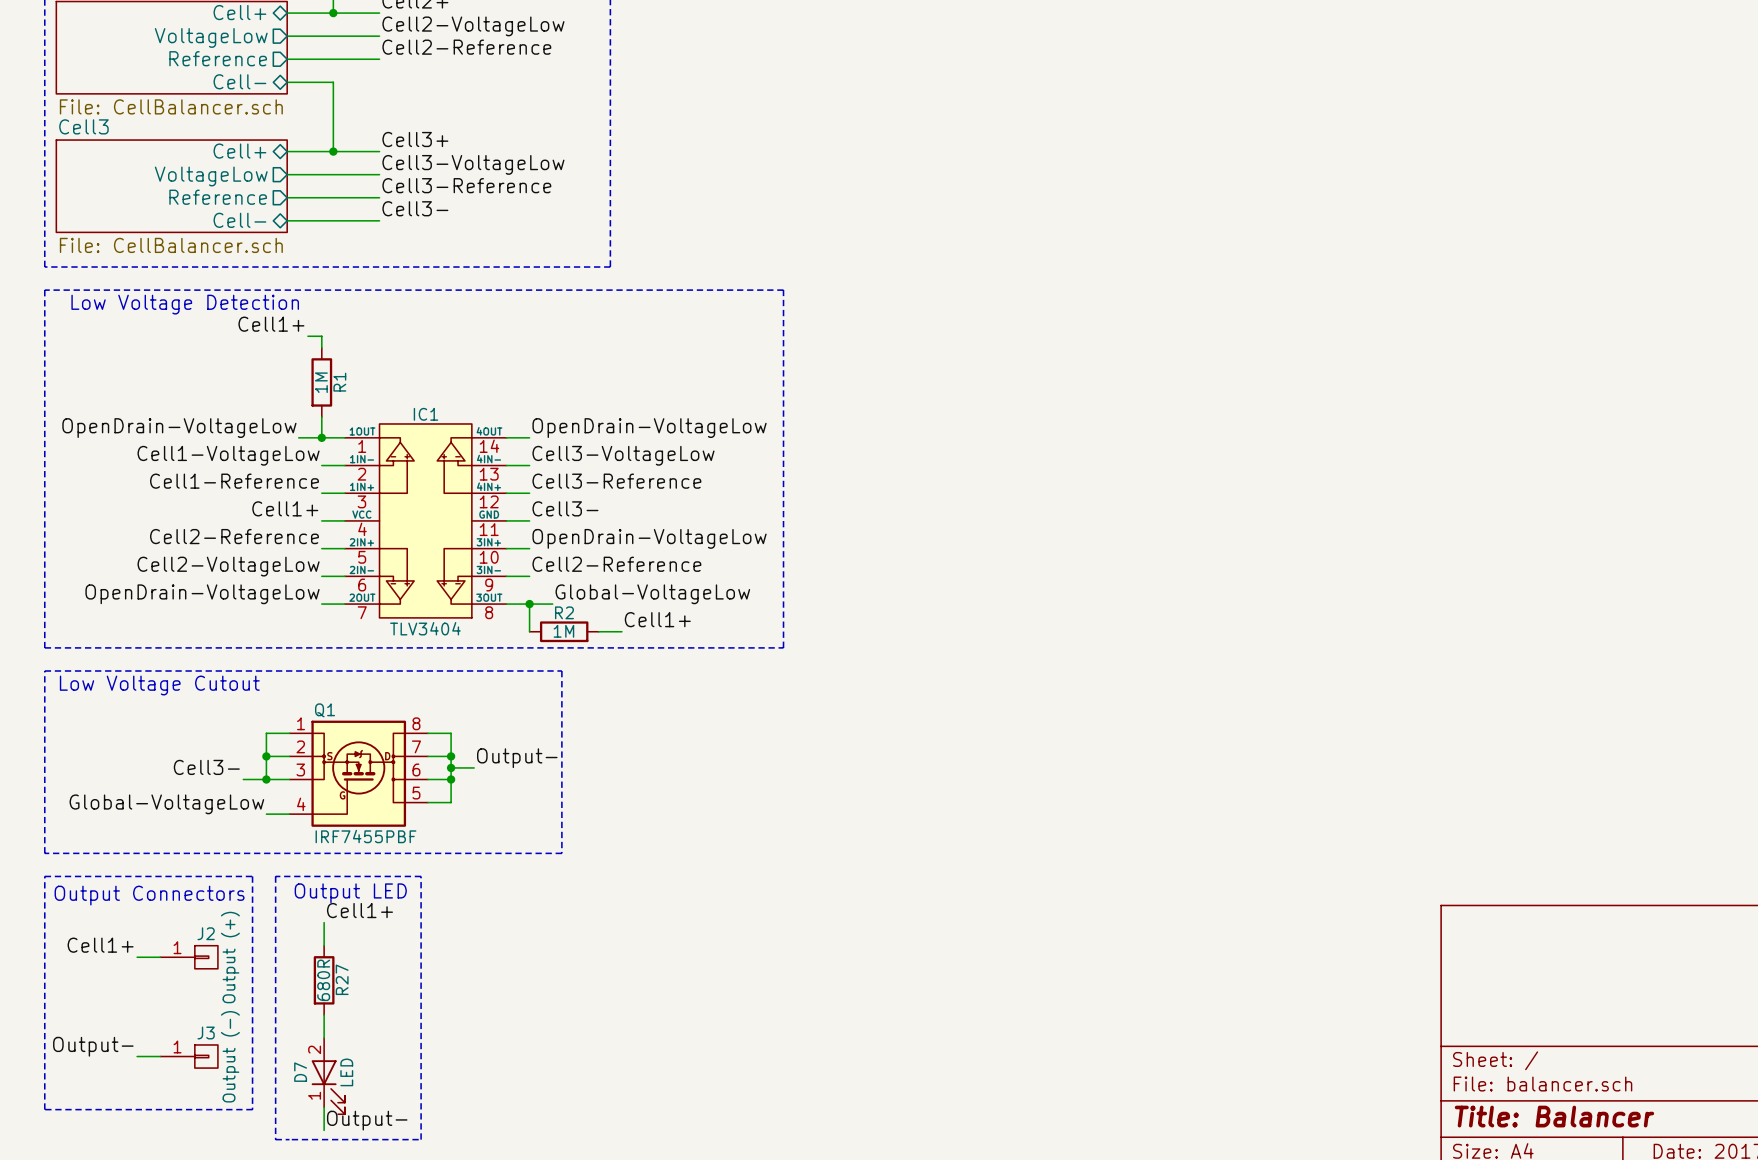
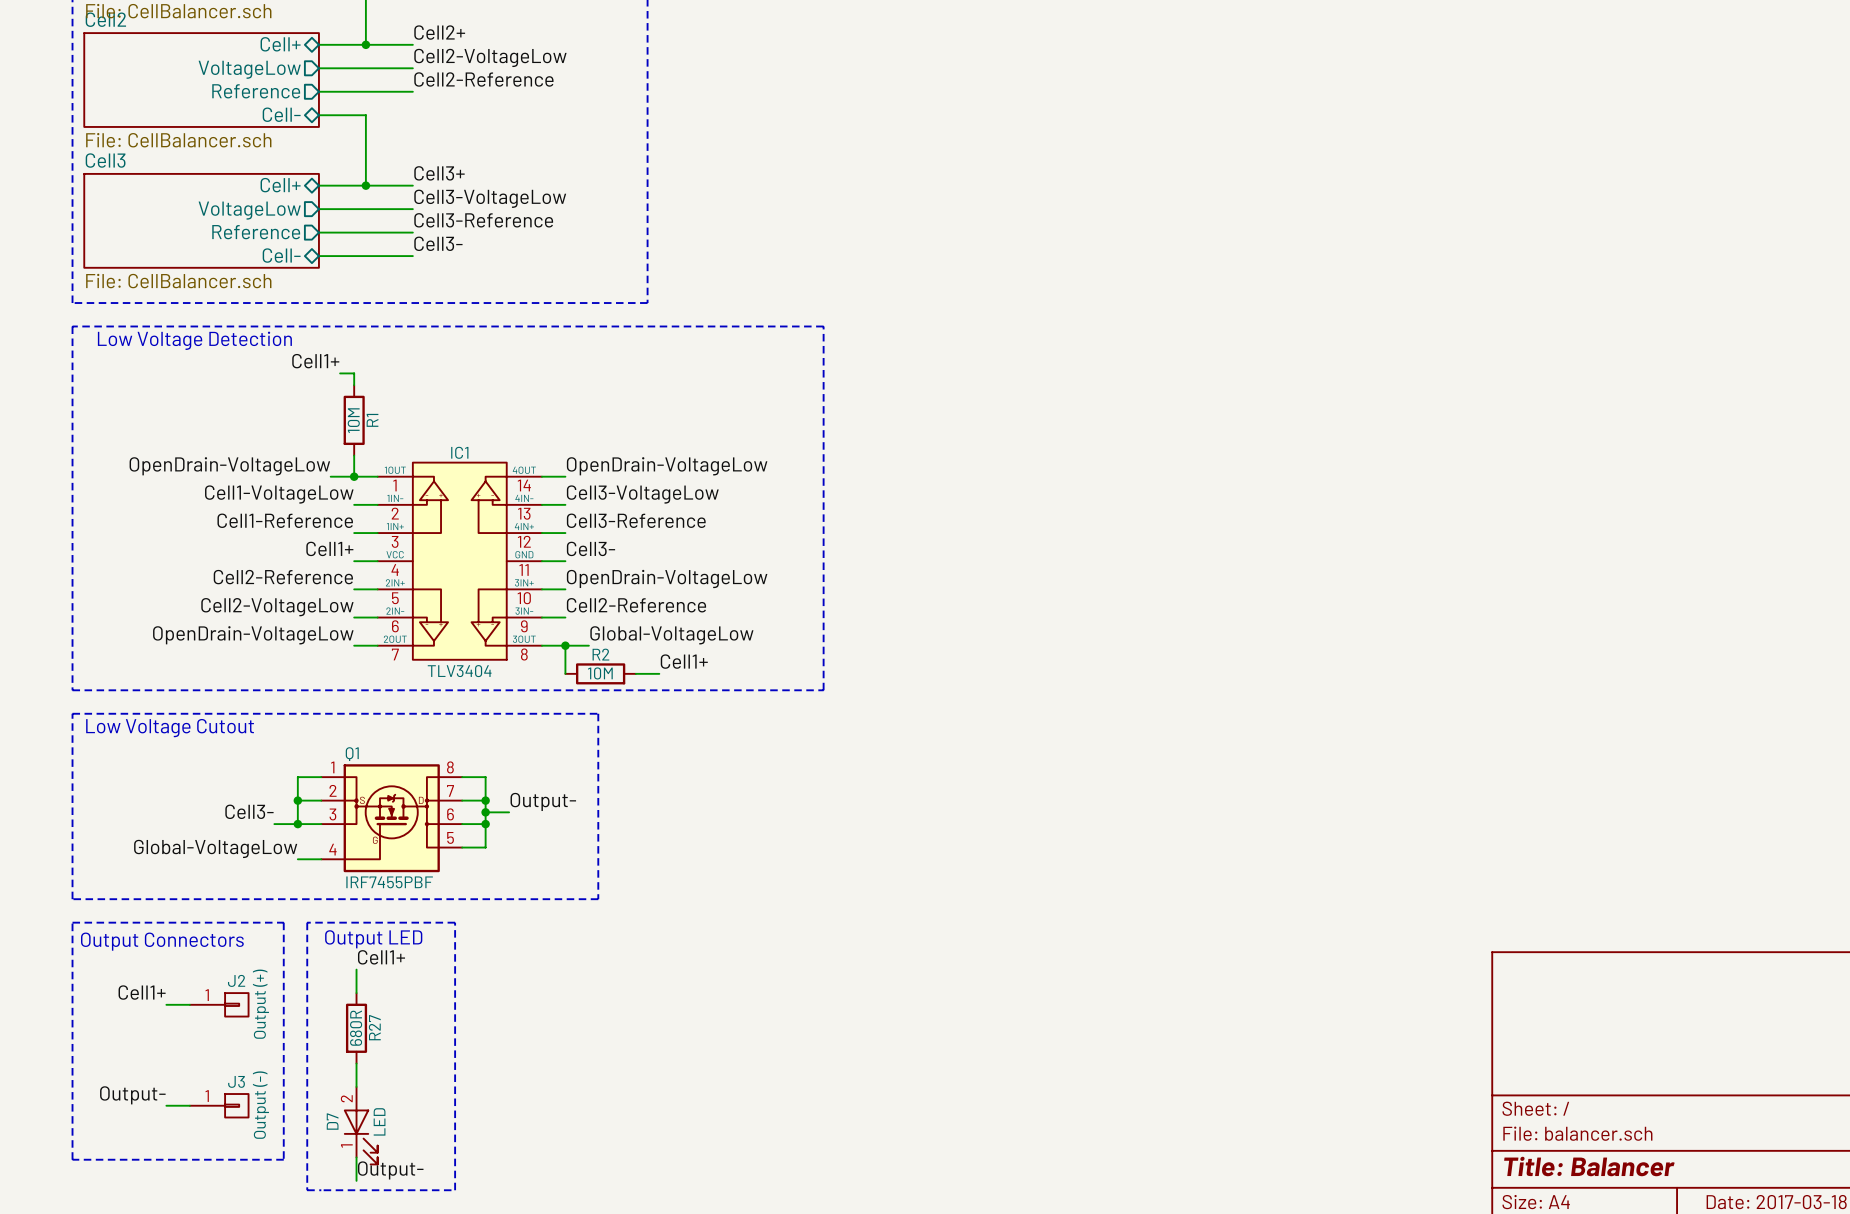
R1 value: 1M (321, 382) -> 10M (353, 420)
R2 value: 1M (563, 631) -> 10M (600, 673)

